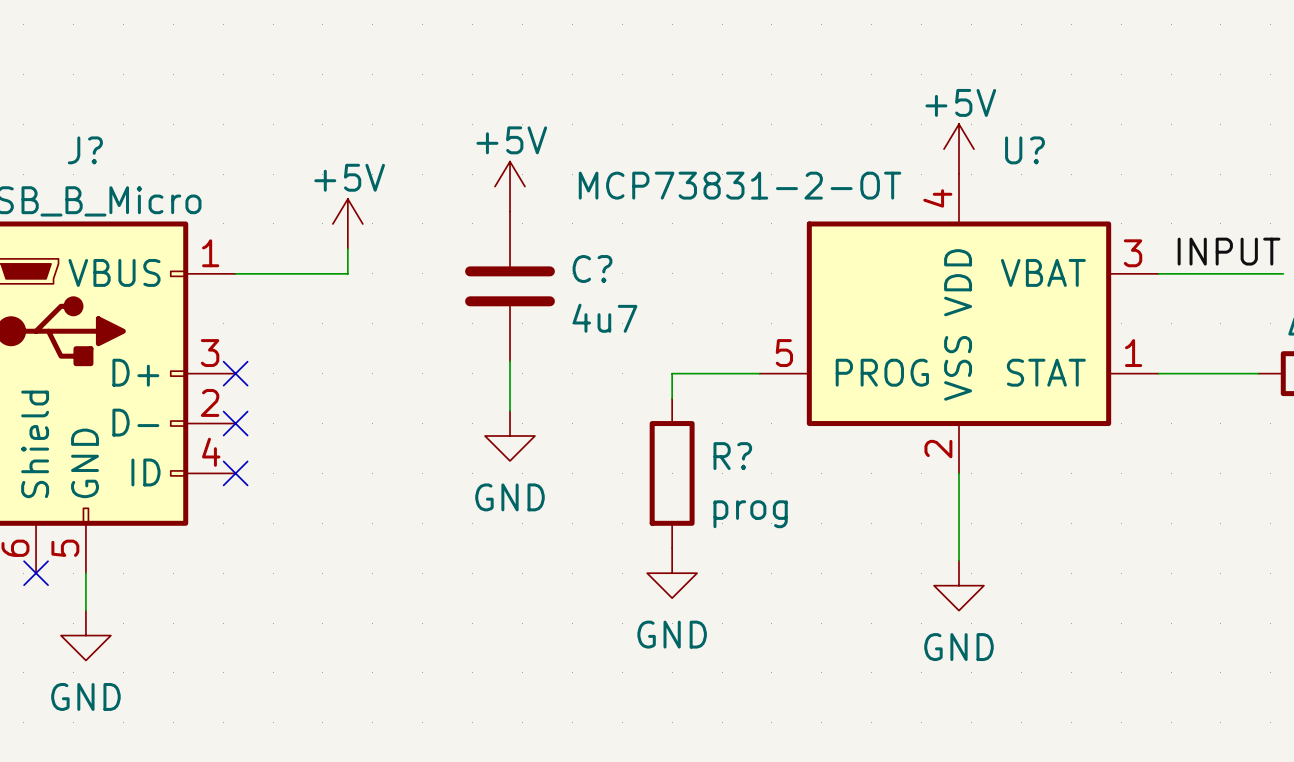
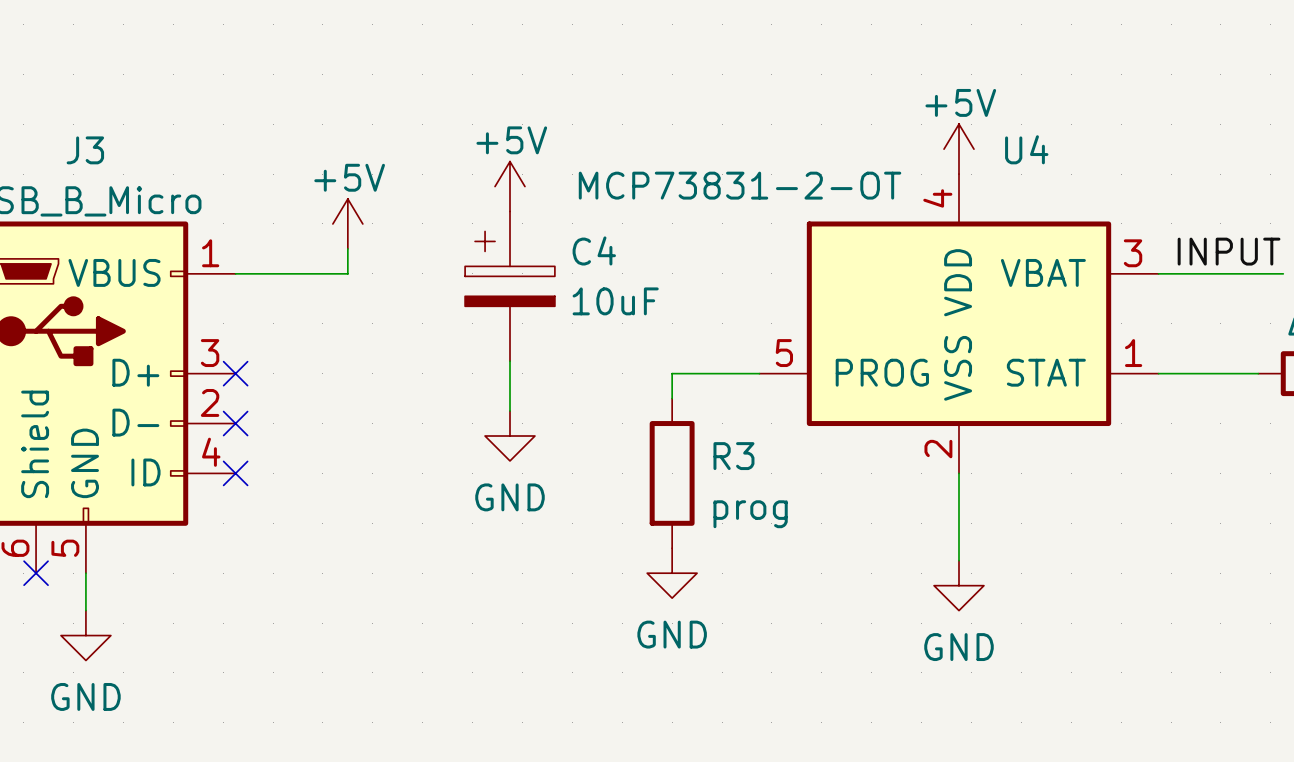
J? name: J? (85, 150) -> J3 (85, 150)
U? name: U? (1024, 150) -> U4 (1026, 149)
C?: 4u7 (509, 286) -> none
C4: none -> 10uF (509, 286)
R? name: R? (732, 456) -> R3 (733, 456)

